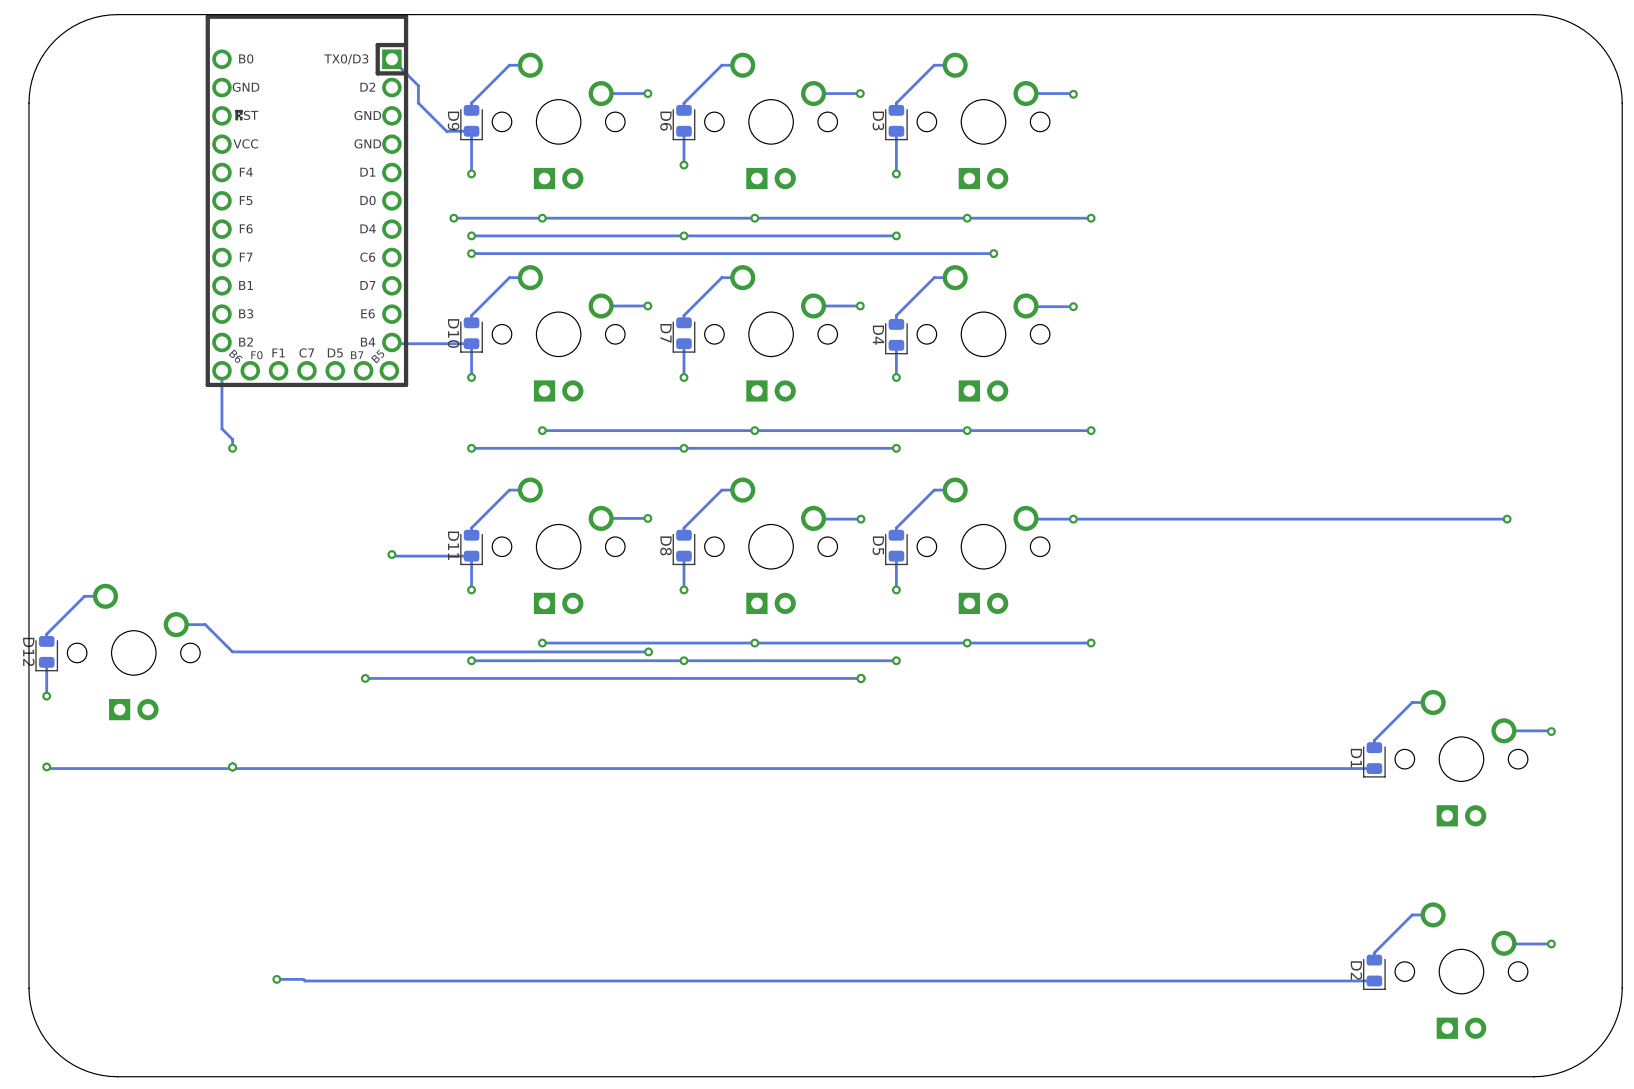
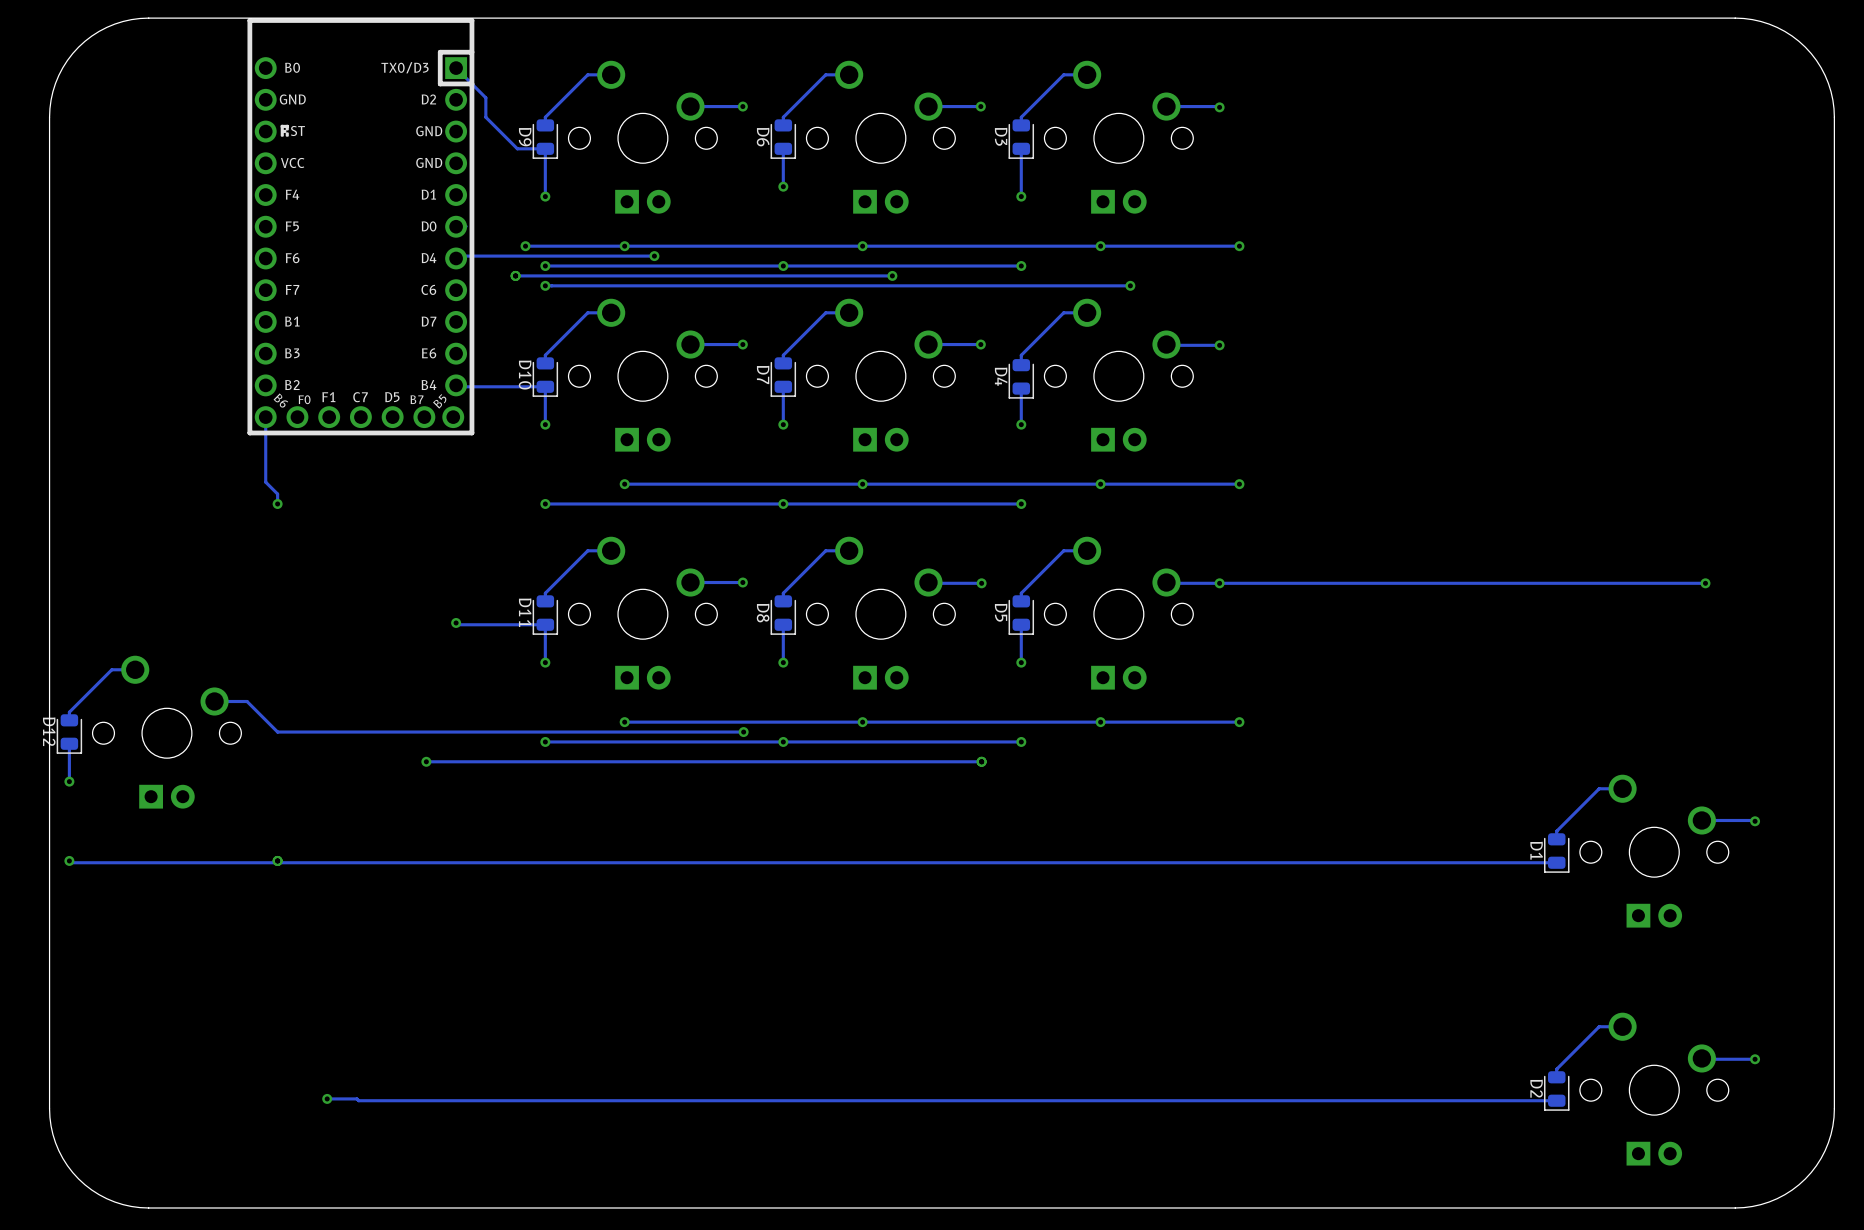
track: none -> (654, 256) (458, 256) (456, 258)
via: none -> (654, 256)
via: none -> (515, 275)
track: none -> (892, 275) (515, 275)
via: none -> (892, 275)

